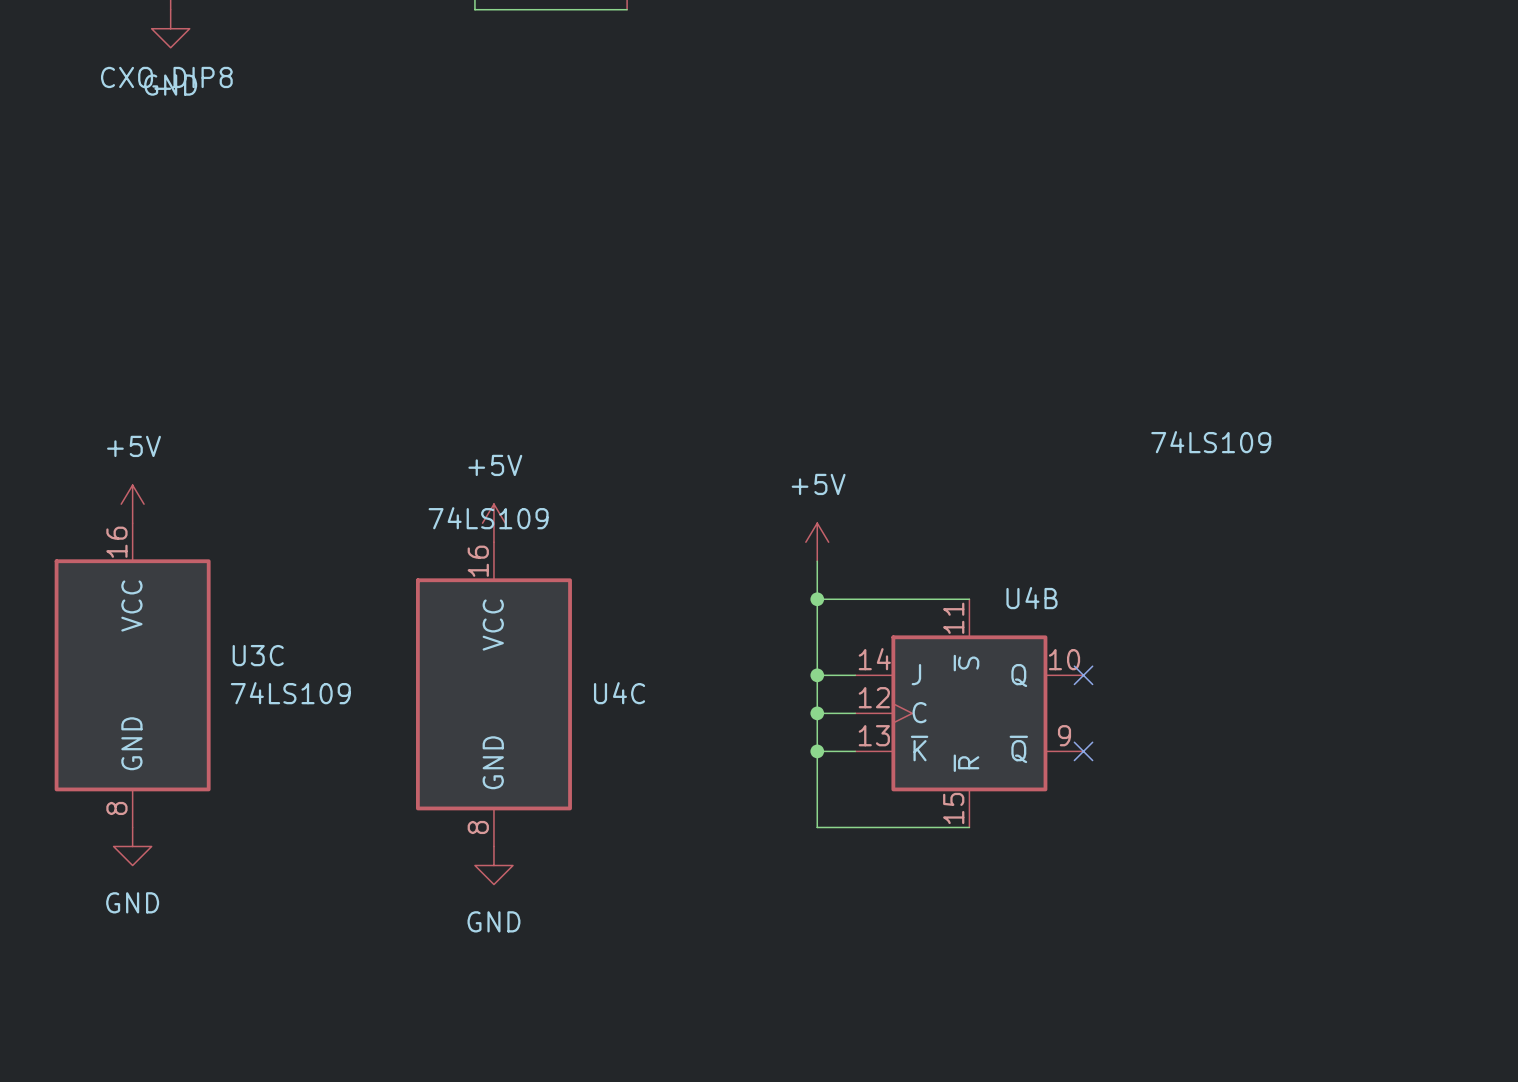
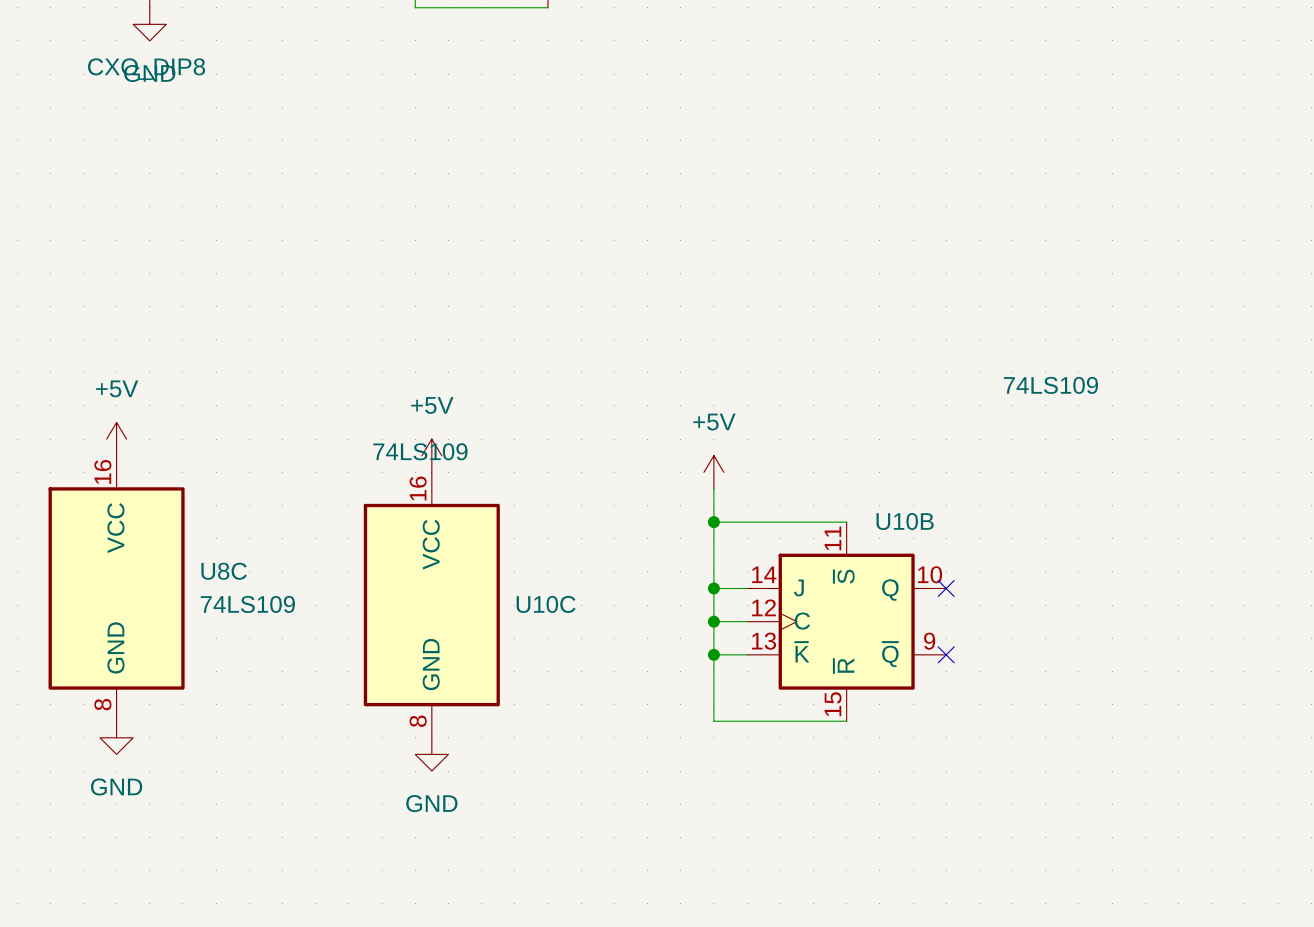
U4B name: U4B (1031, 598) -> U10B (905, 521)
U3C name: U3C (258, 655) -> U8C (224, 571)
U4C name: U4C (619, 693) -> U10C (546, 604)

